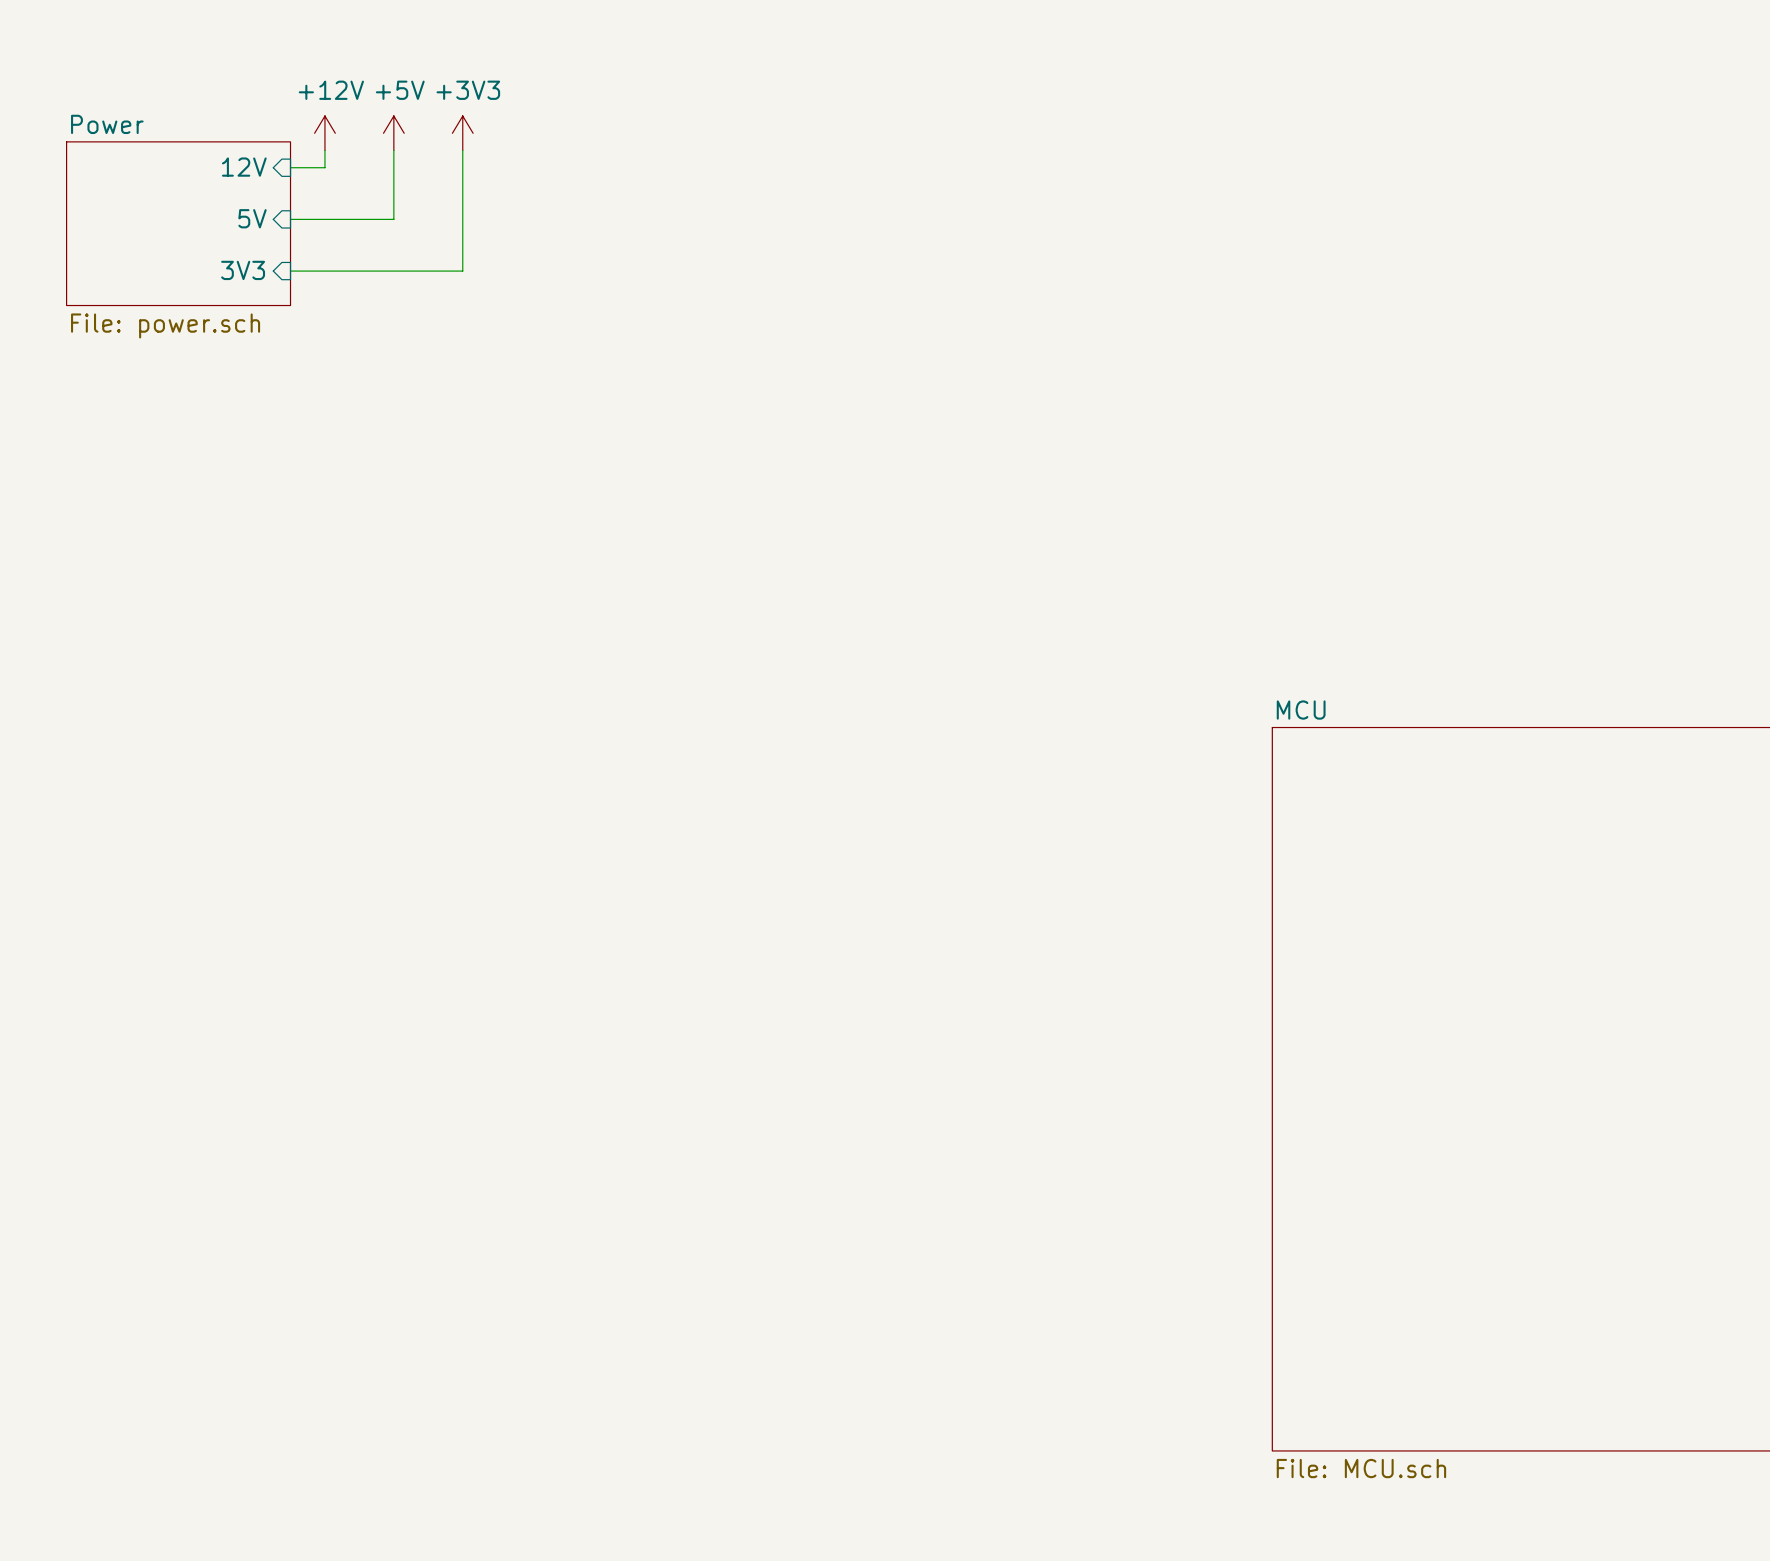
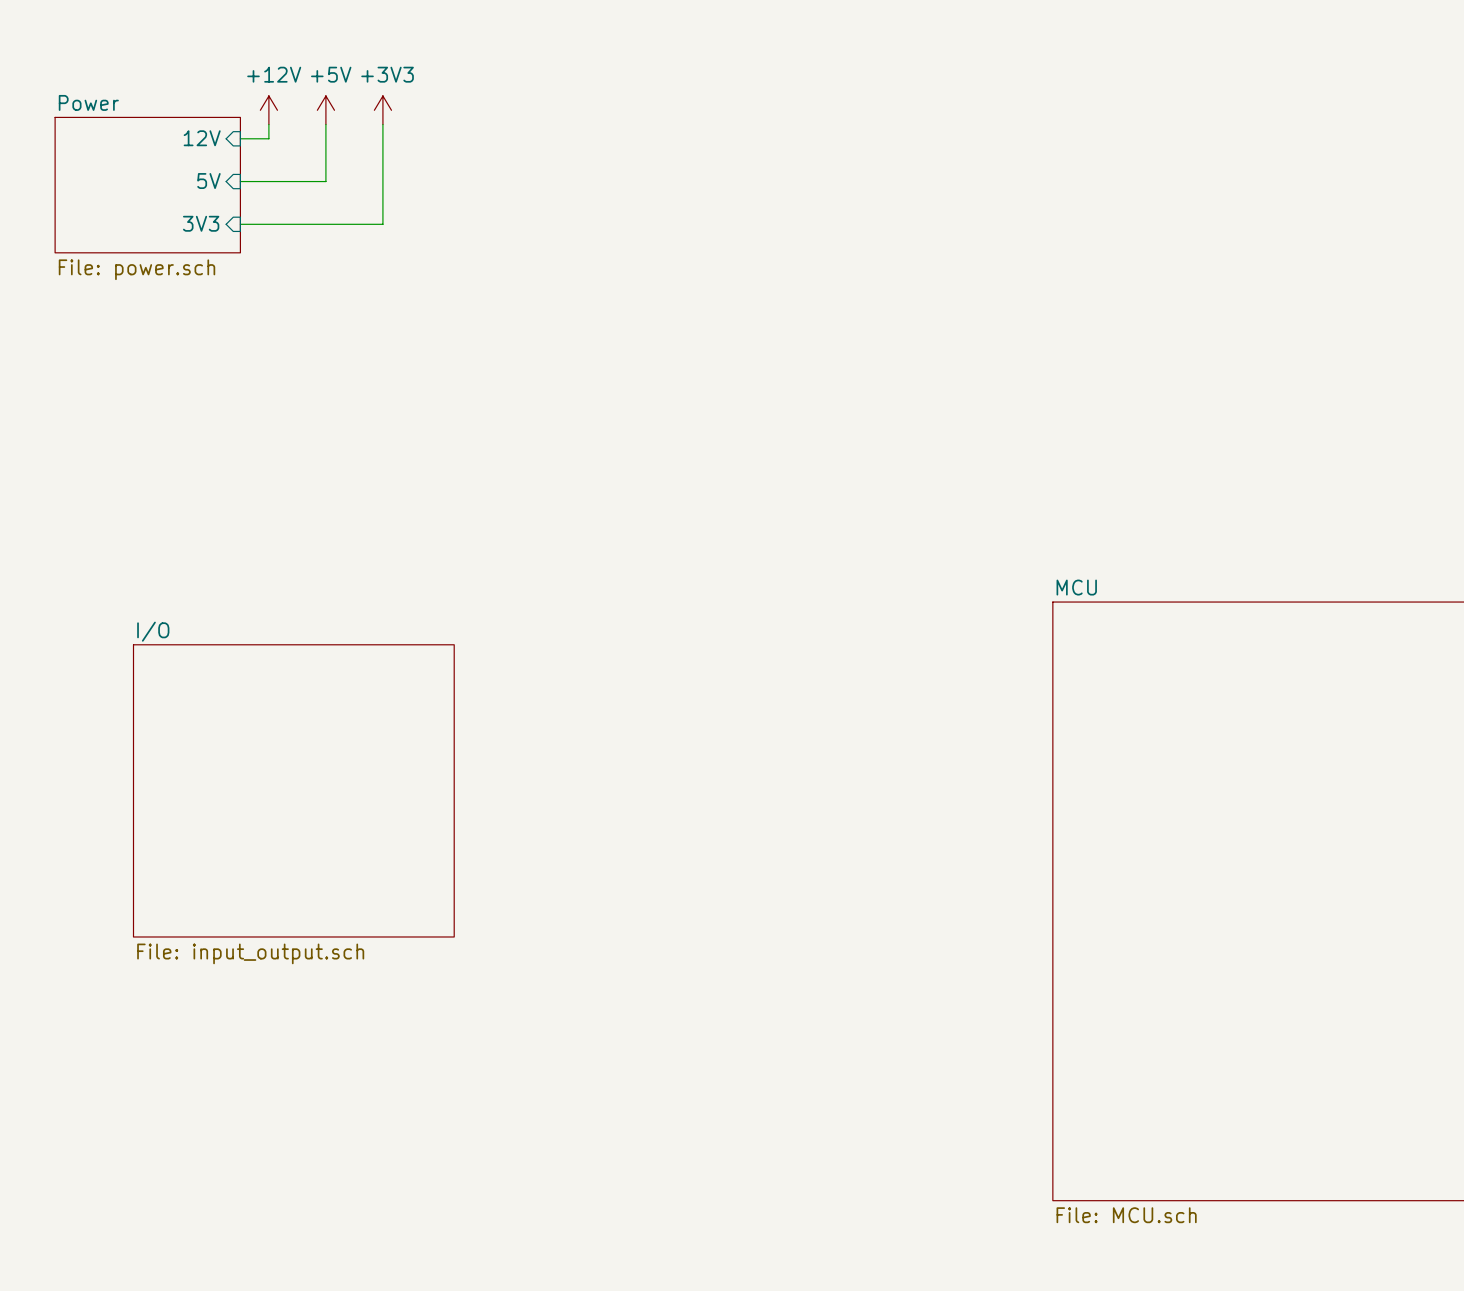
sheet I/O: none -> File: input_output.sch (293, 790)

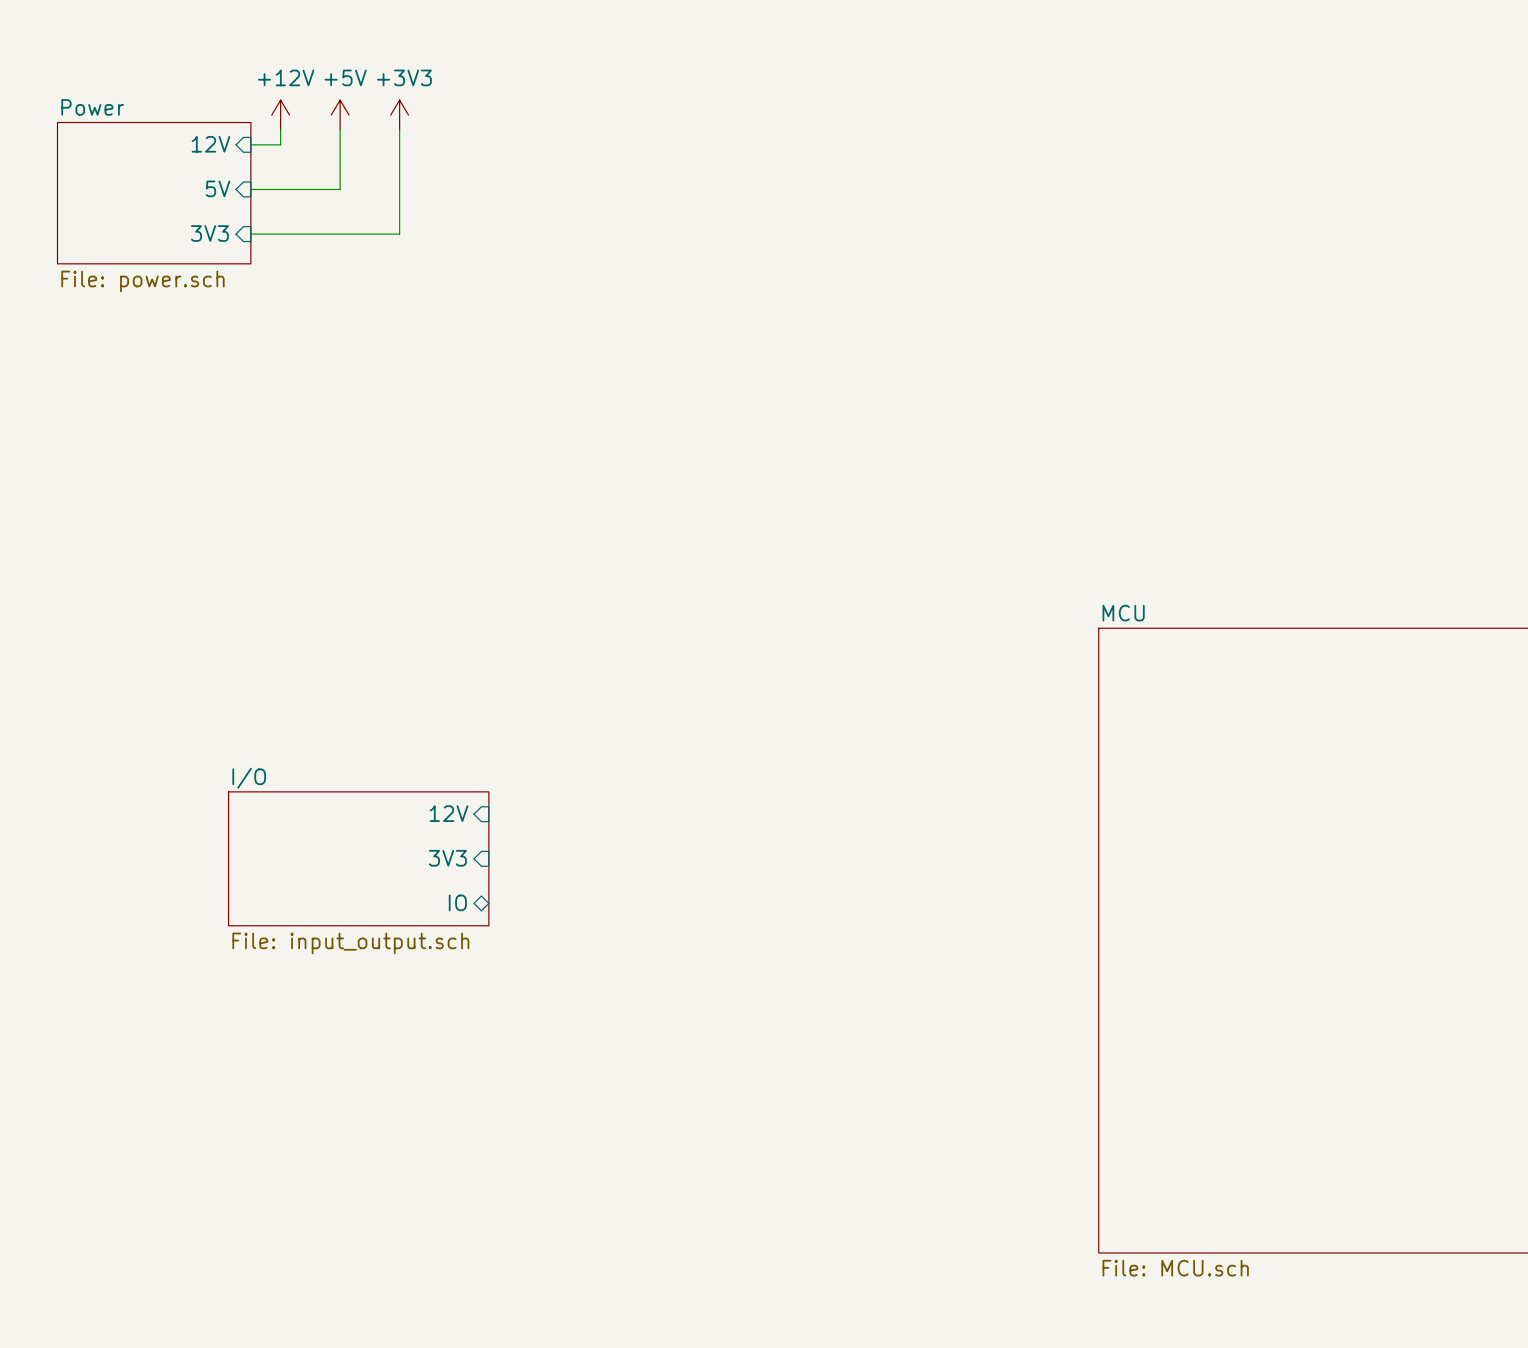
sheet pin: none -> 12V (448, 813)
sheet I/O: File: input_output.sch (293, 790) -> none
sheet I/O: none -> File: input_output.sch (358, 858)
sheet pin: none -> 3V3 (447, 858)
sheet pin: none -> IO (457, 902)

